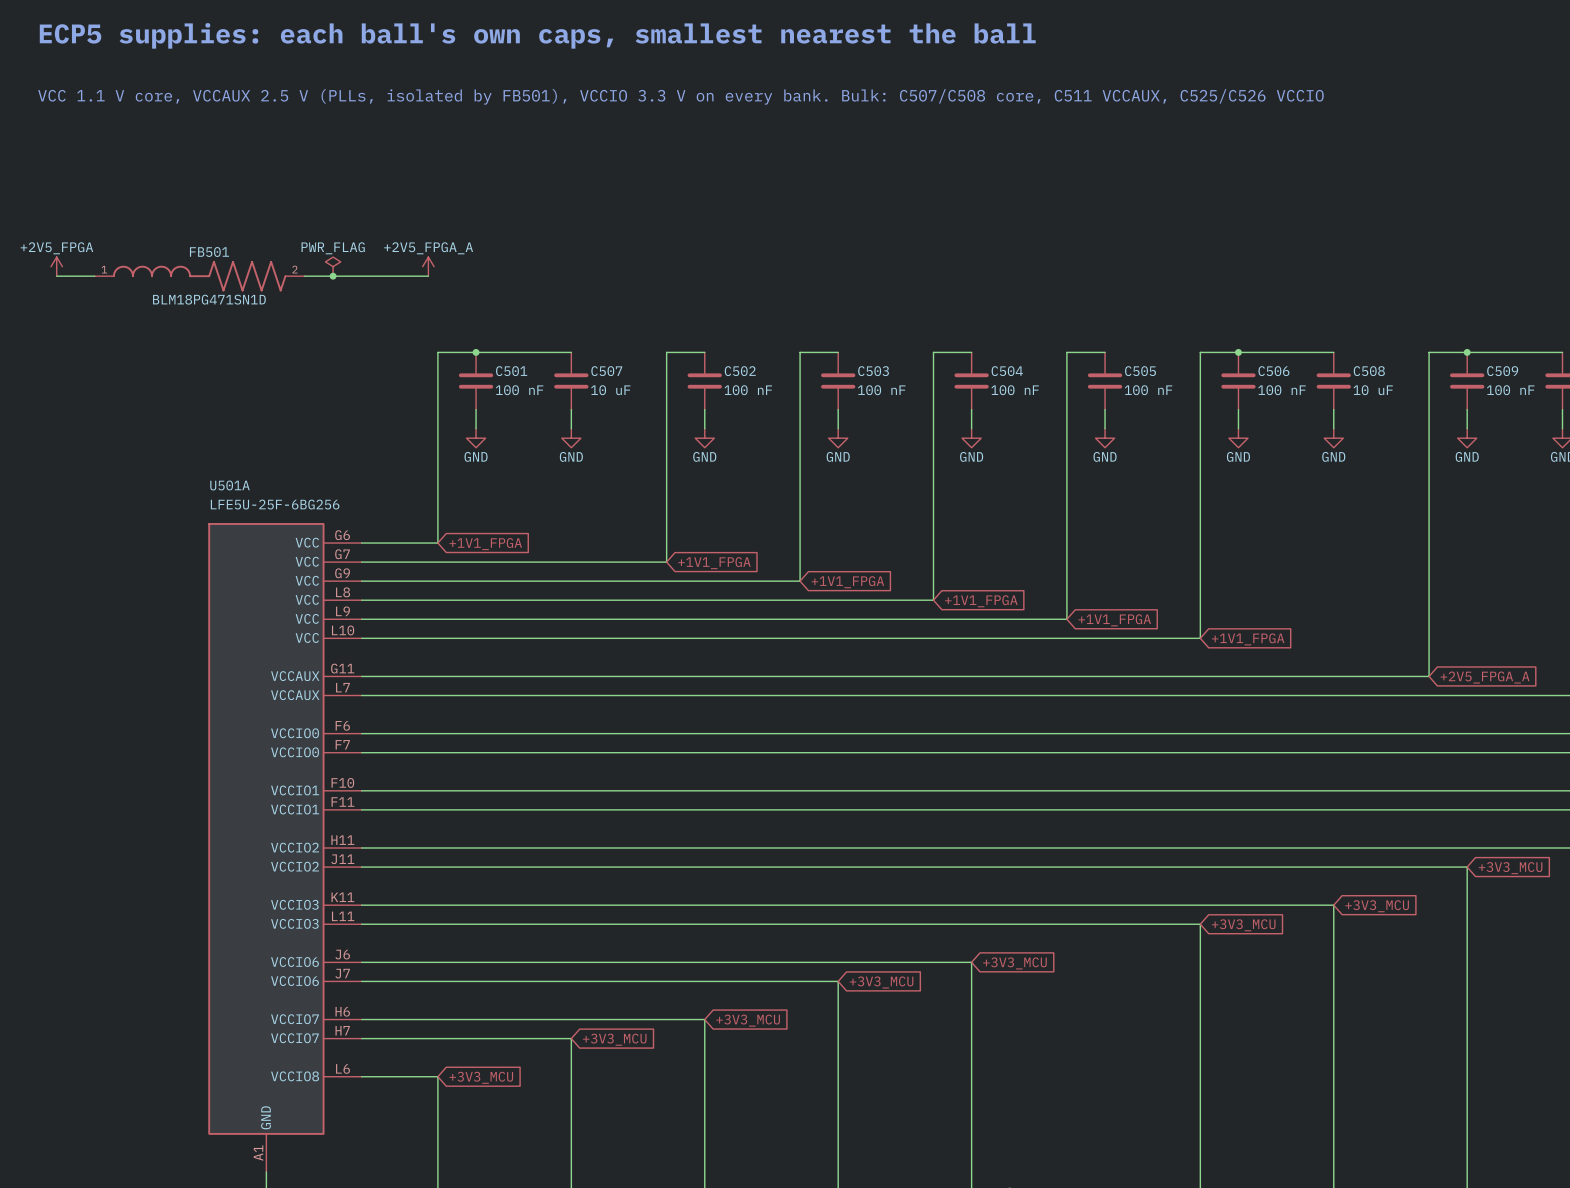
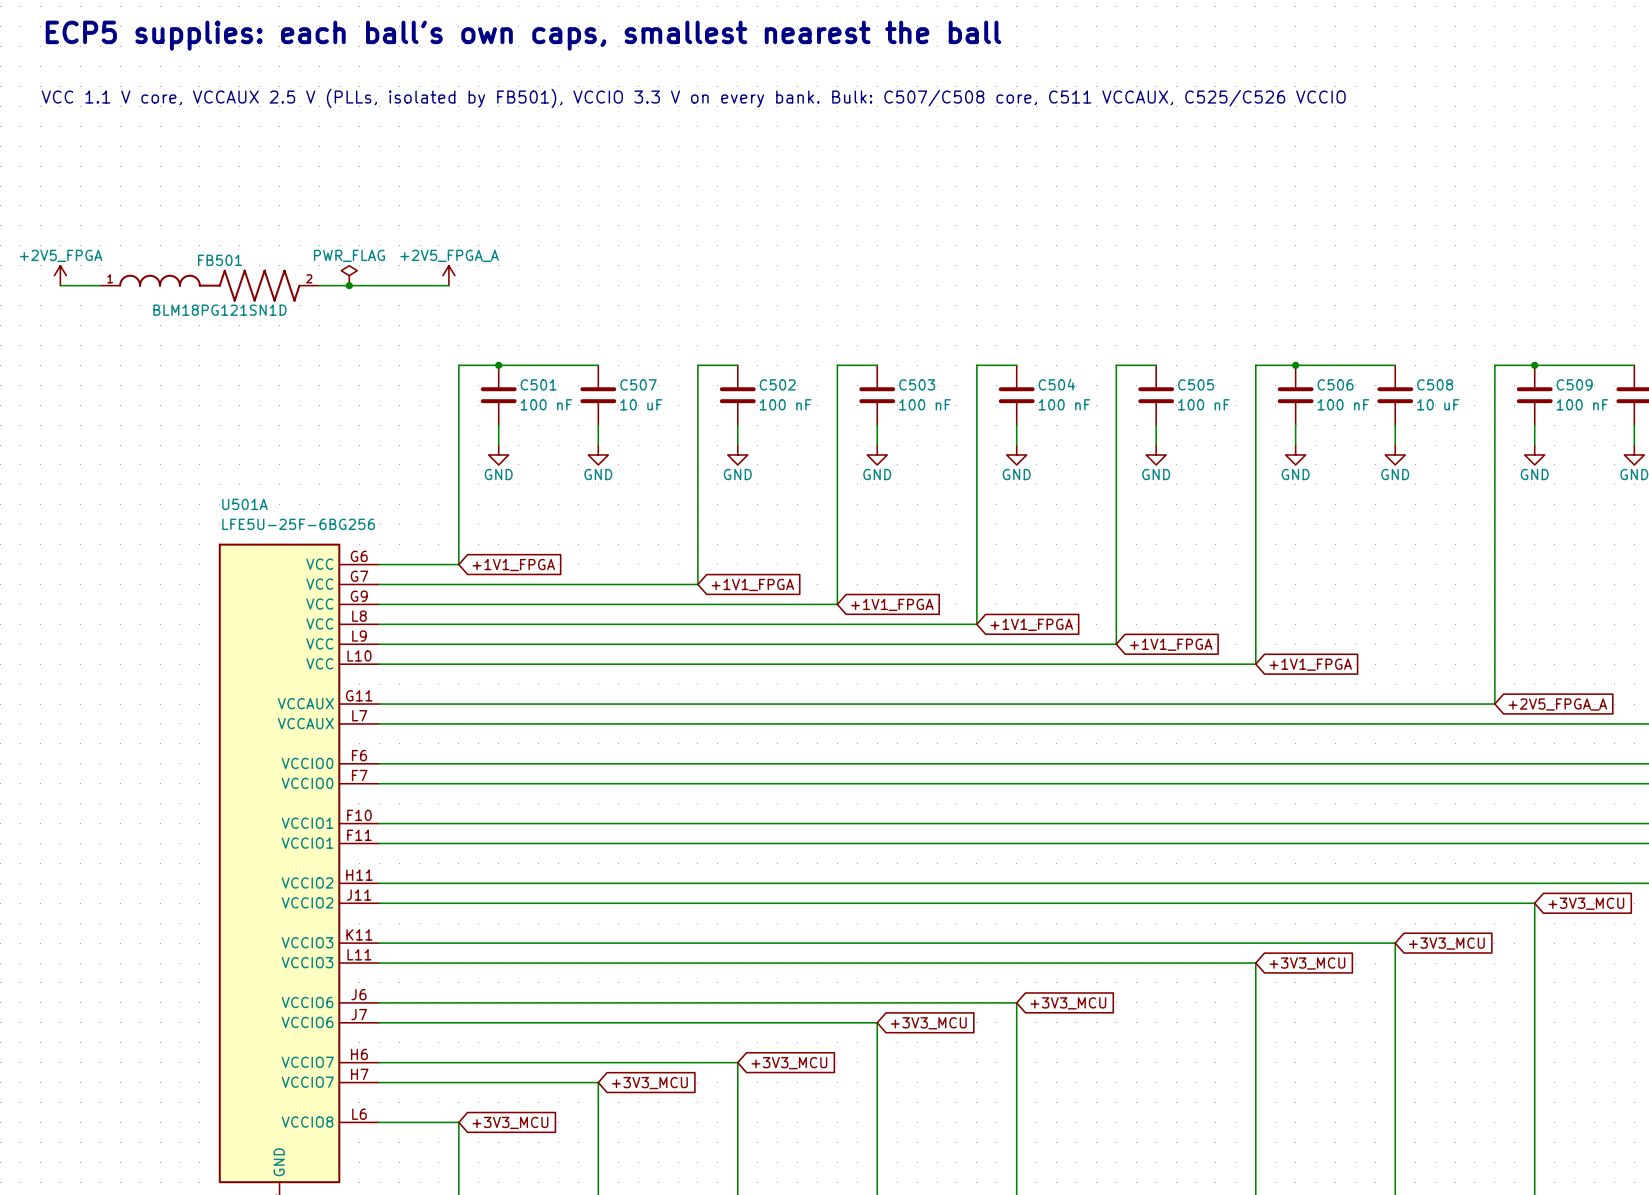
FB501 value: BLM18PG471SN1D (209, 299) -> BLM18PG121SN1D (220, 310)

